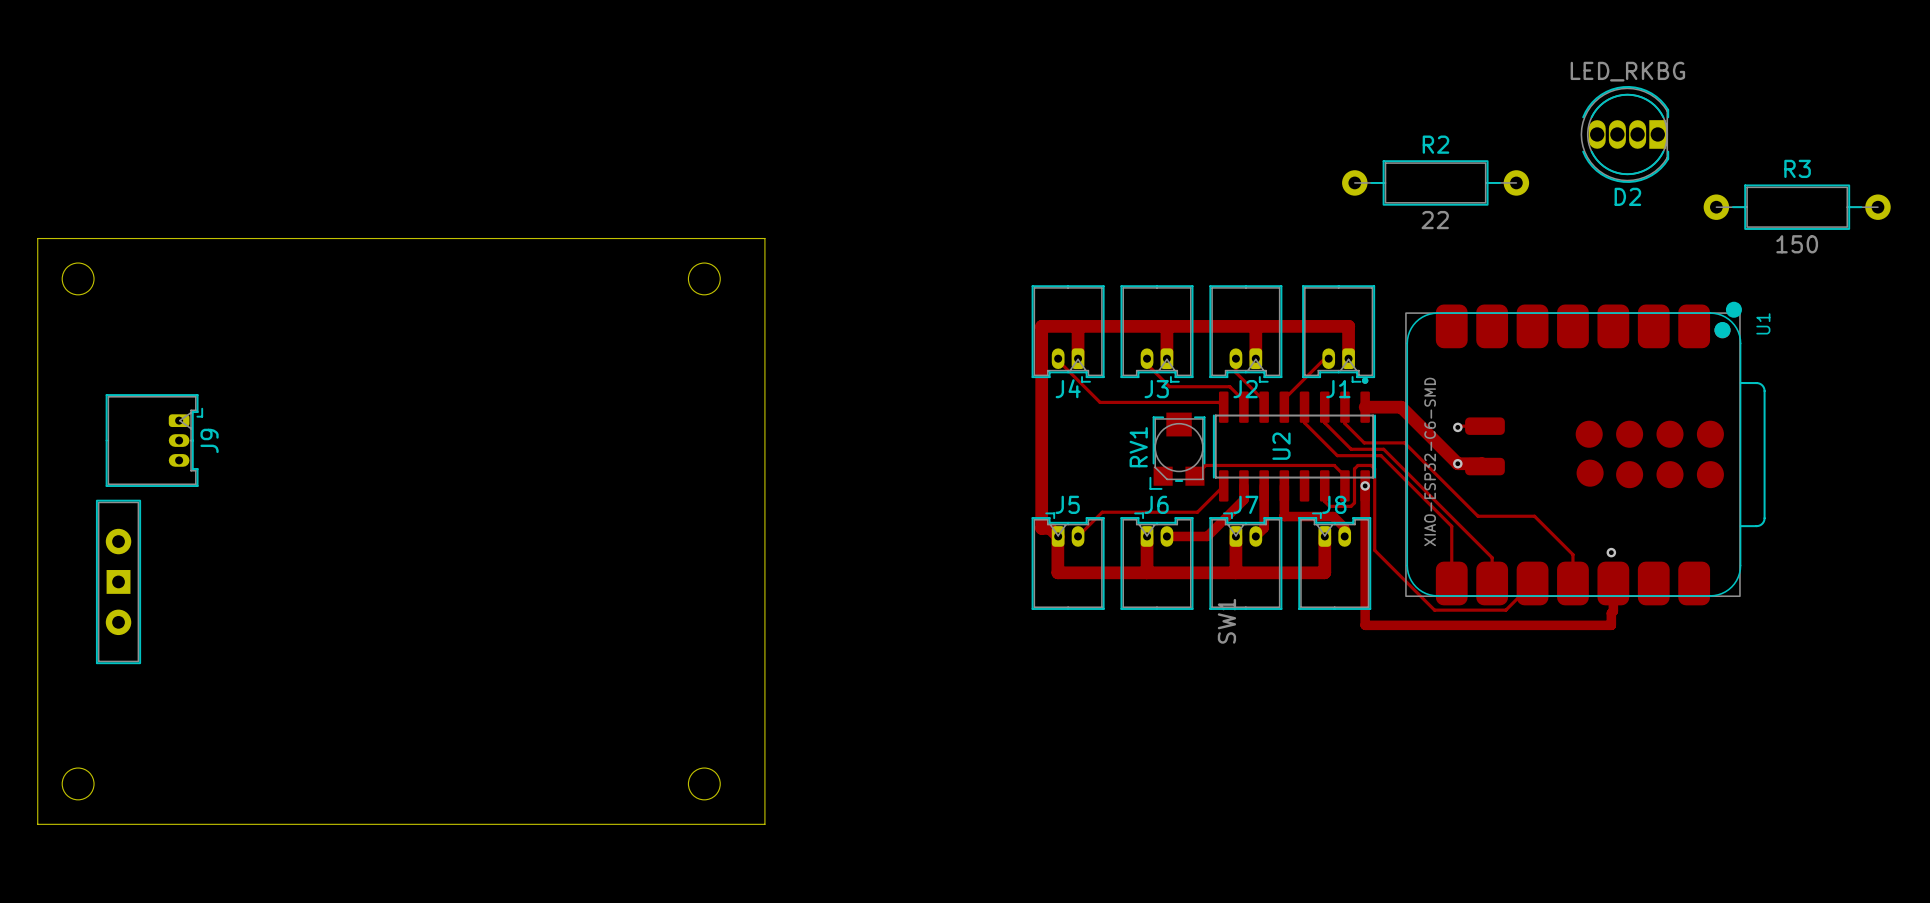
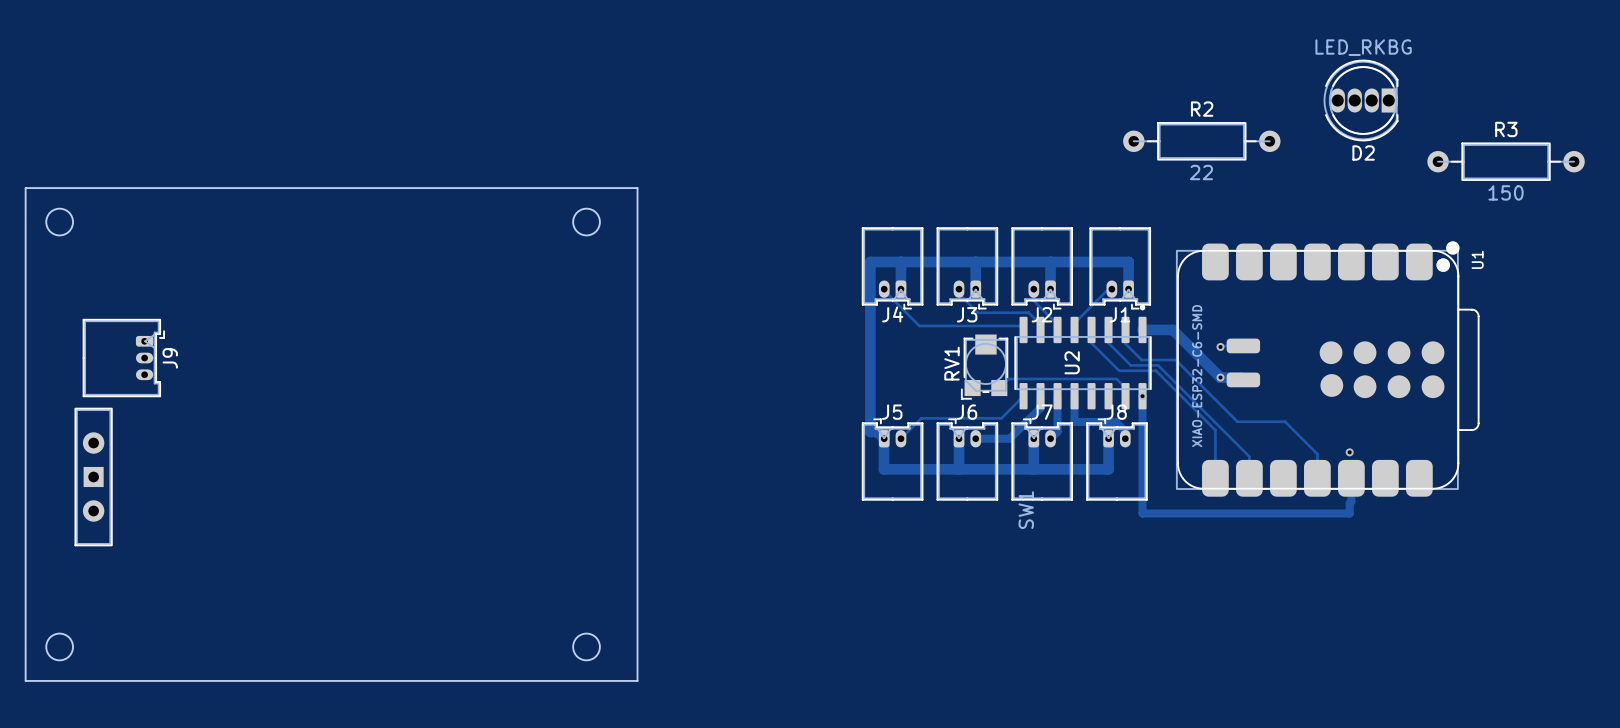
track: (1324, 485) (1324, 501) (1329, 506) (1351, 506) (1354, 502) (1354, 468) (1357, 465) (1371, 465) (1374, 468) (1374, 550) (1434, 610) (1505, 610) (1532, 582) -> none

